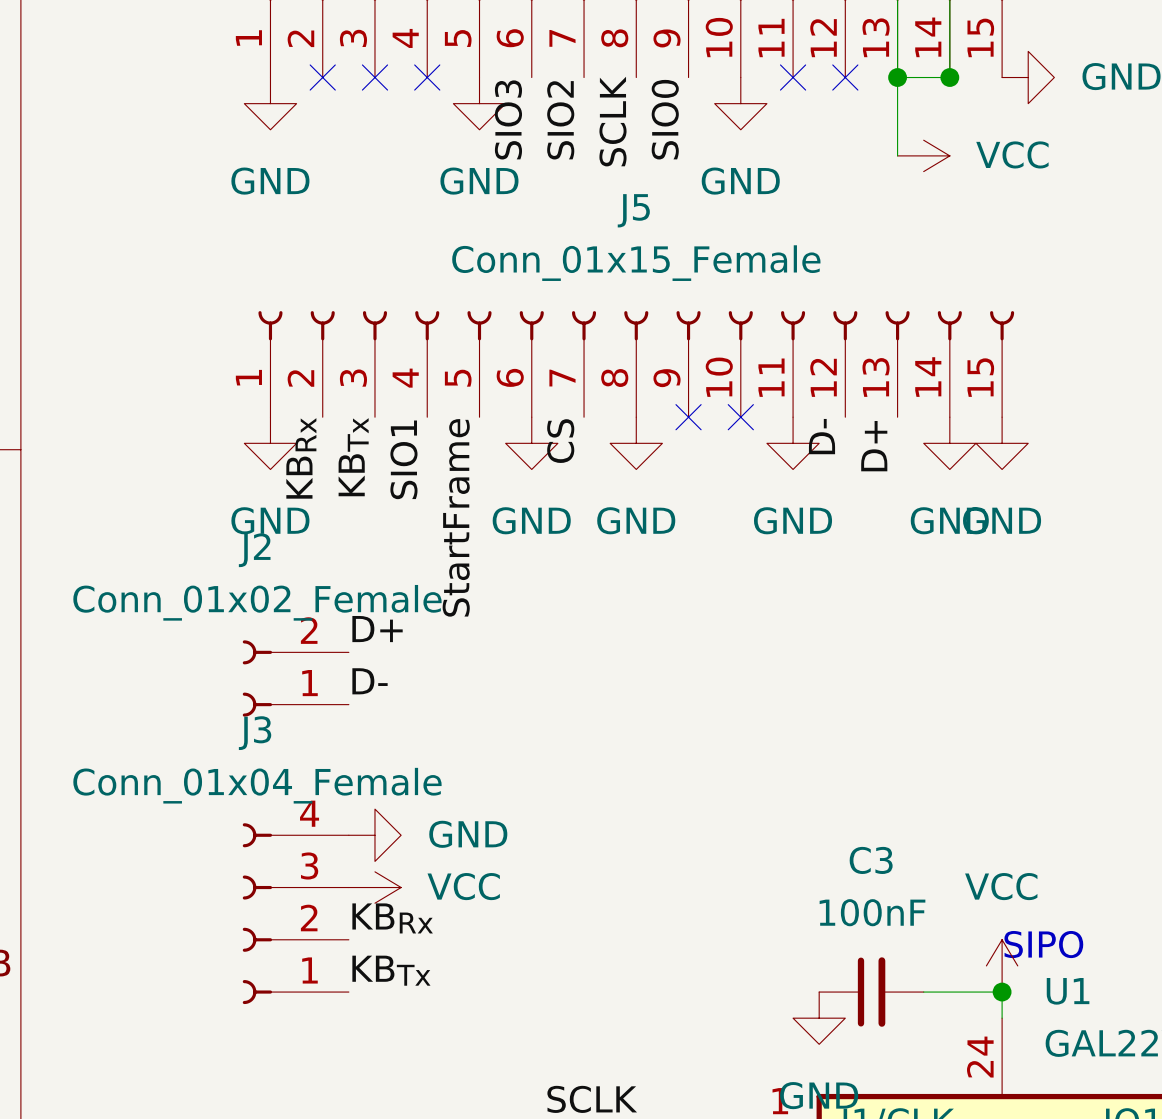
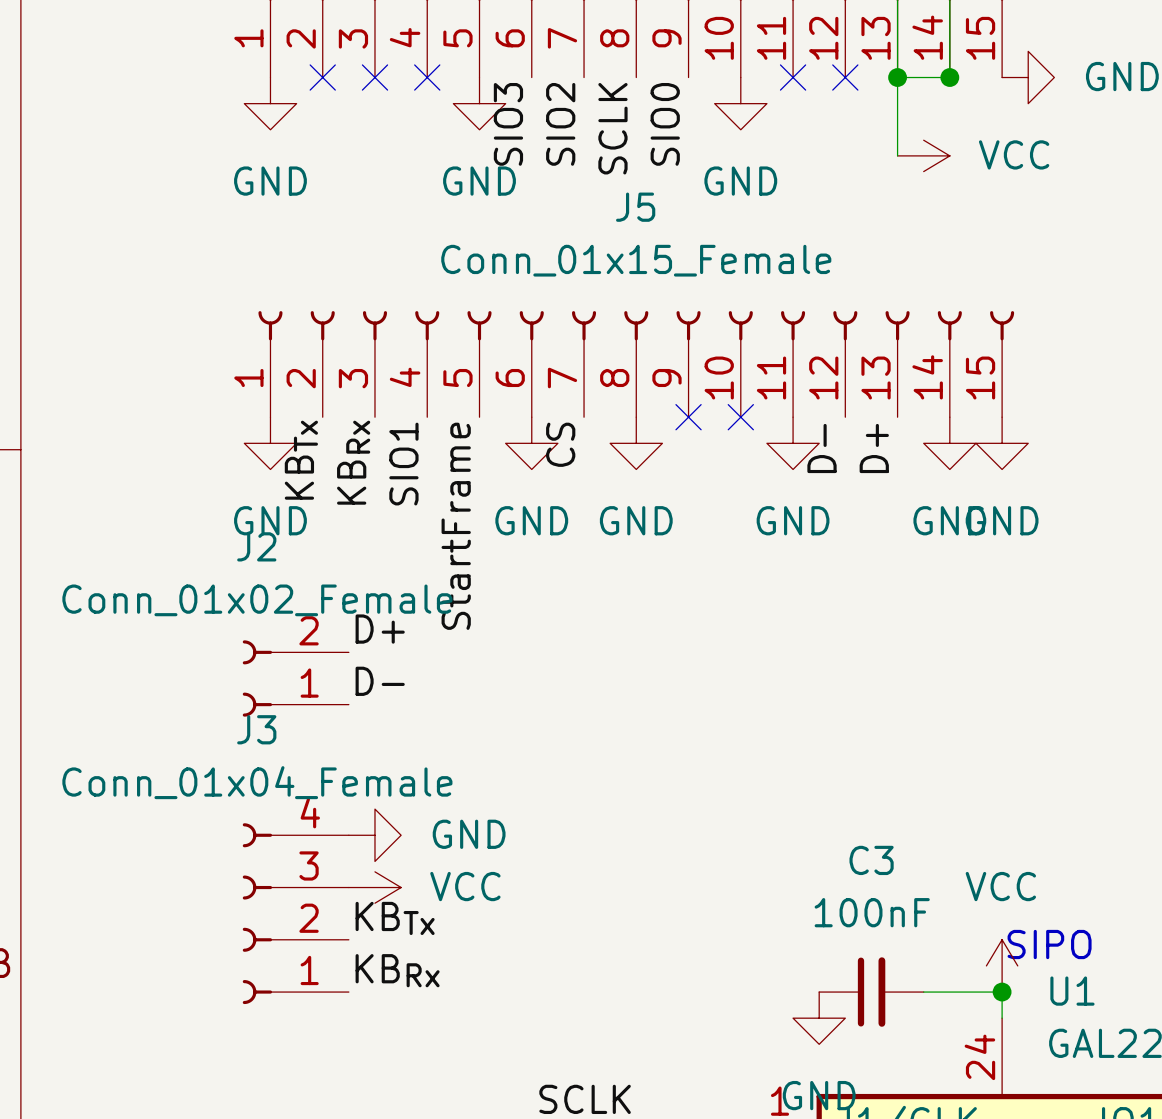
label: KBTx (353, 457) -> KBRx (353, 462)
label: KBRx (301, 458) -> KBTx (301, 460)
label: KBRx (392, 918) -> KBTx (395, 918)
label: KBTx (391, 970) -> KBRx (397, 970)

